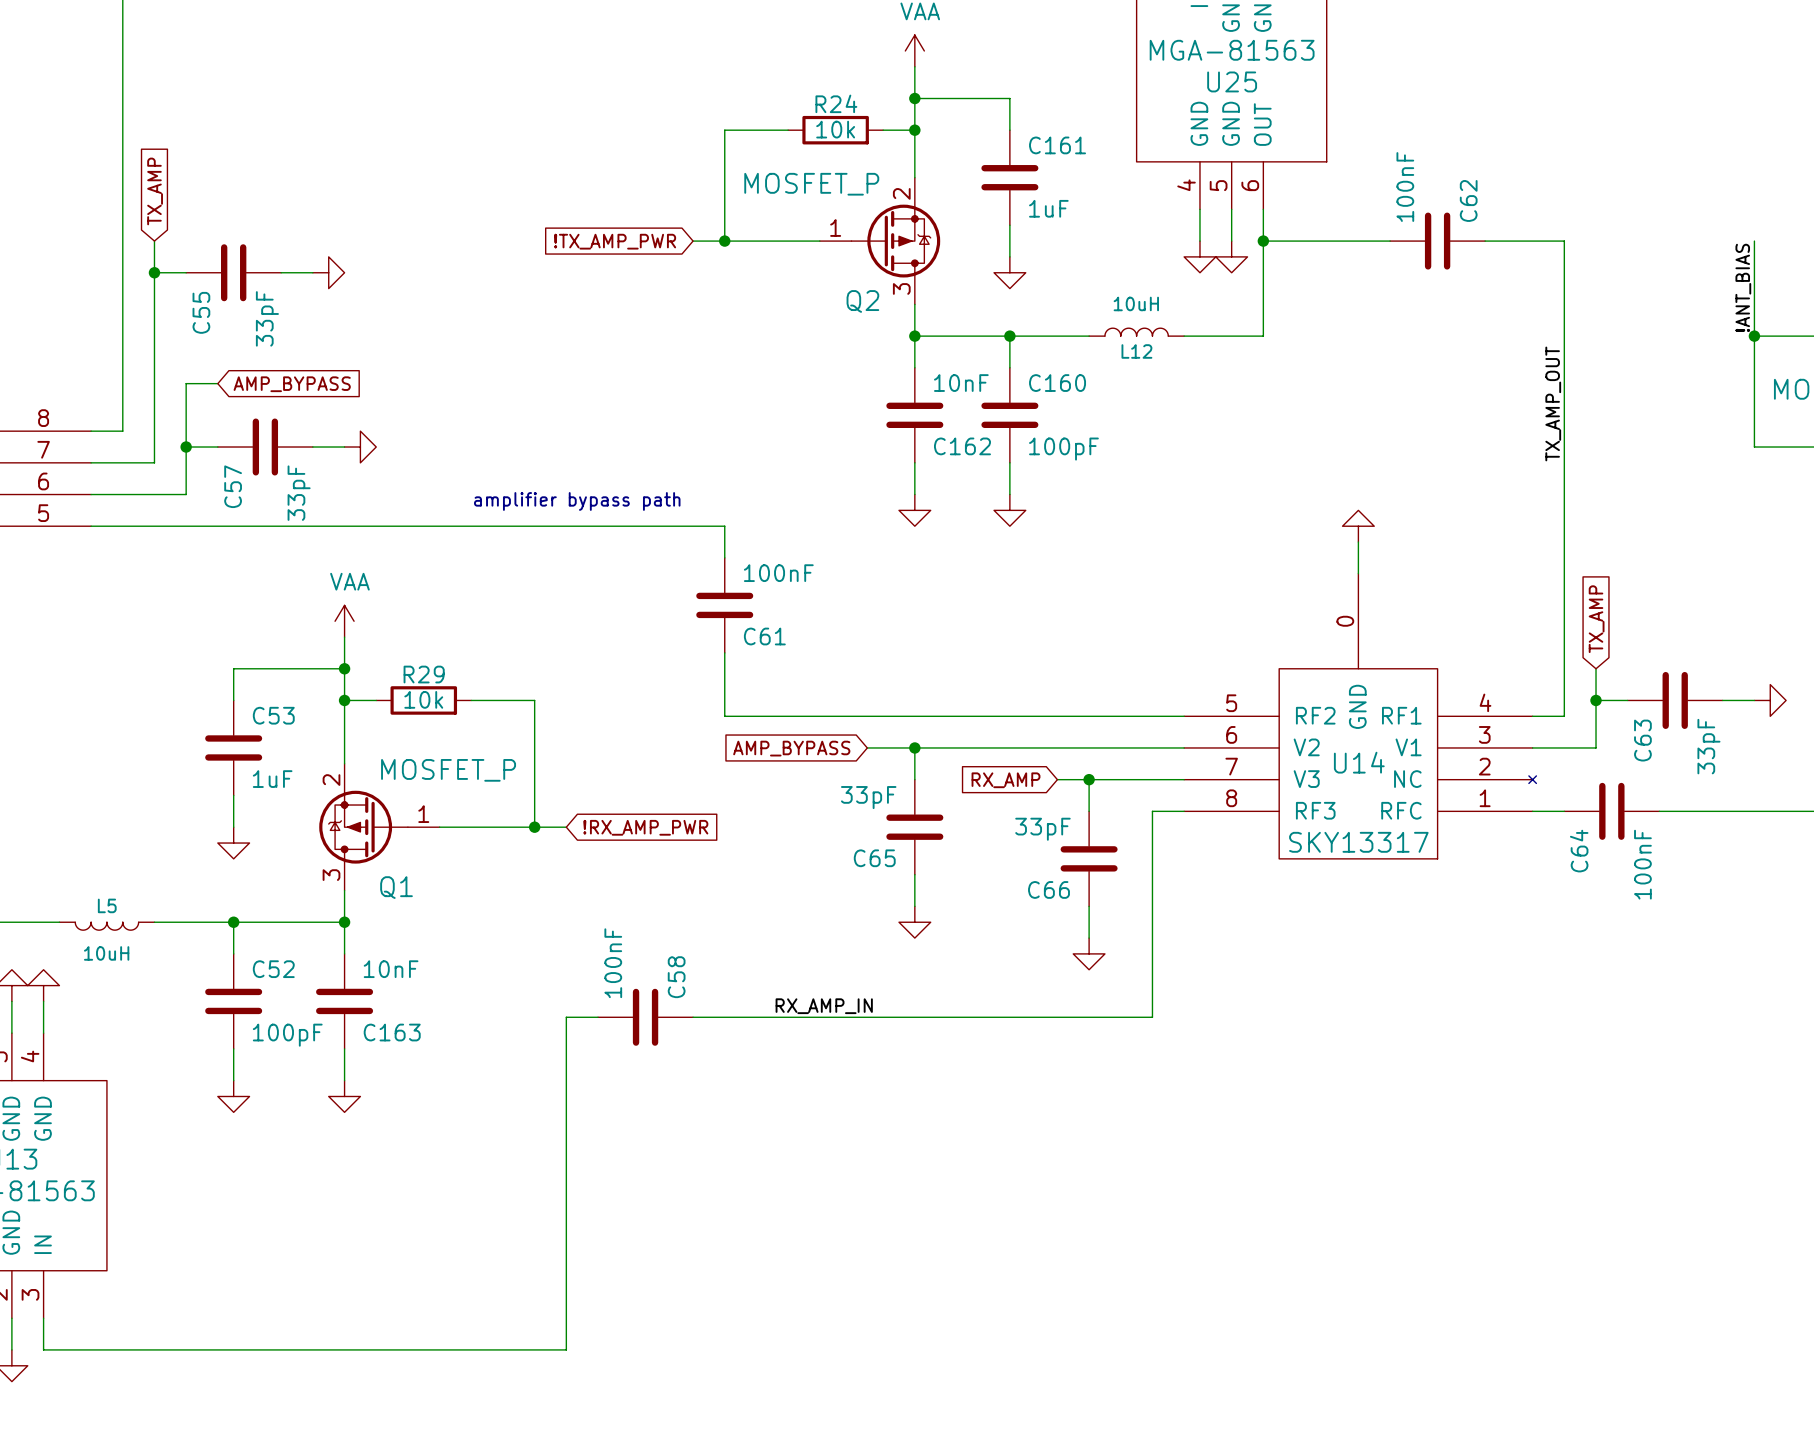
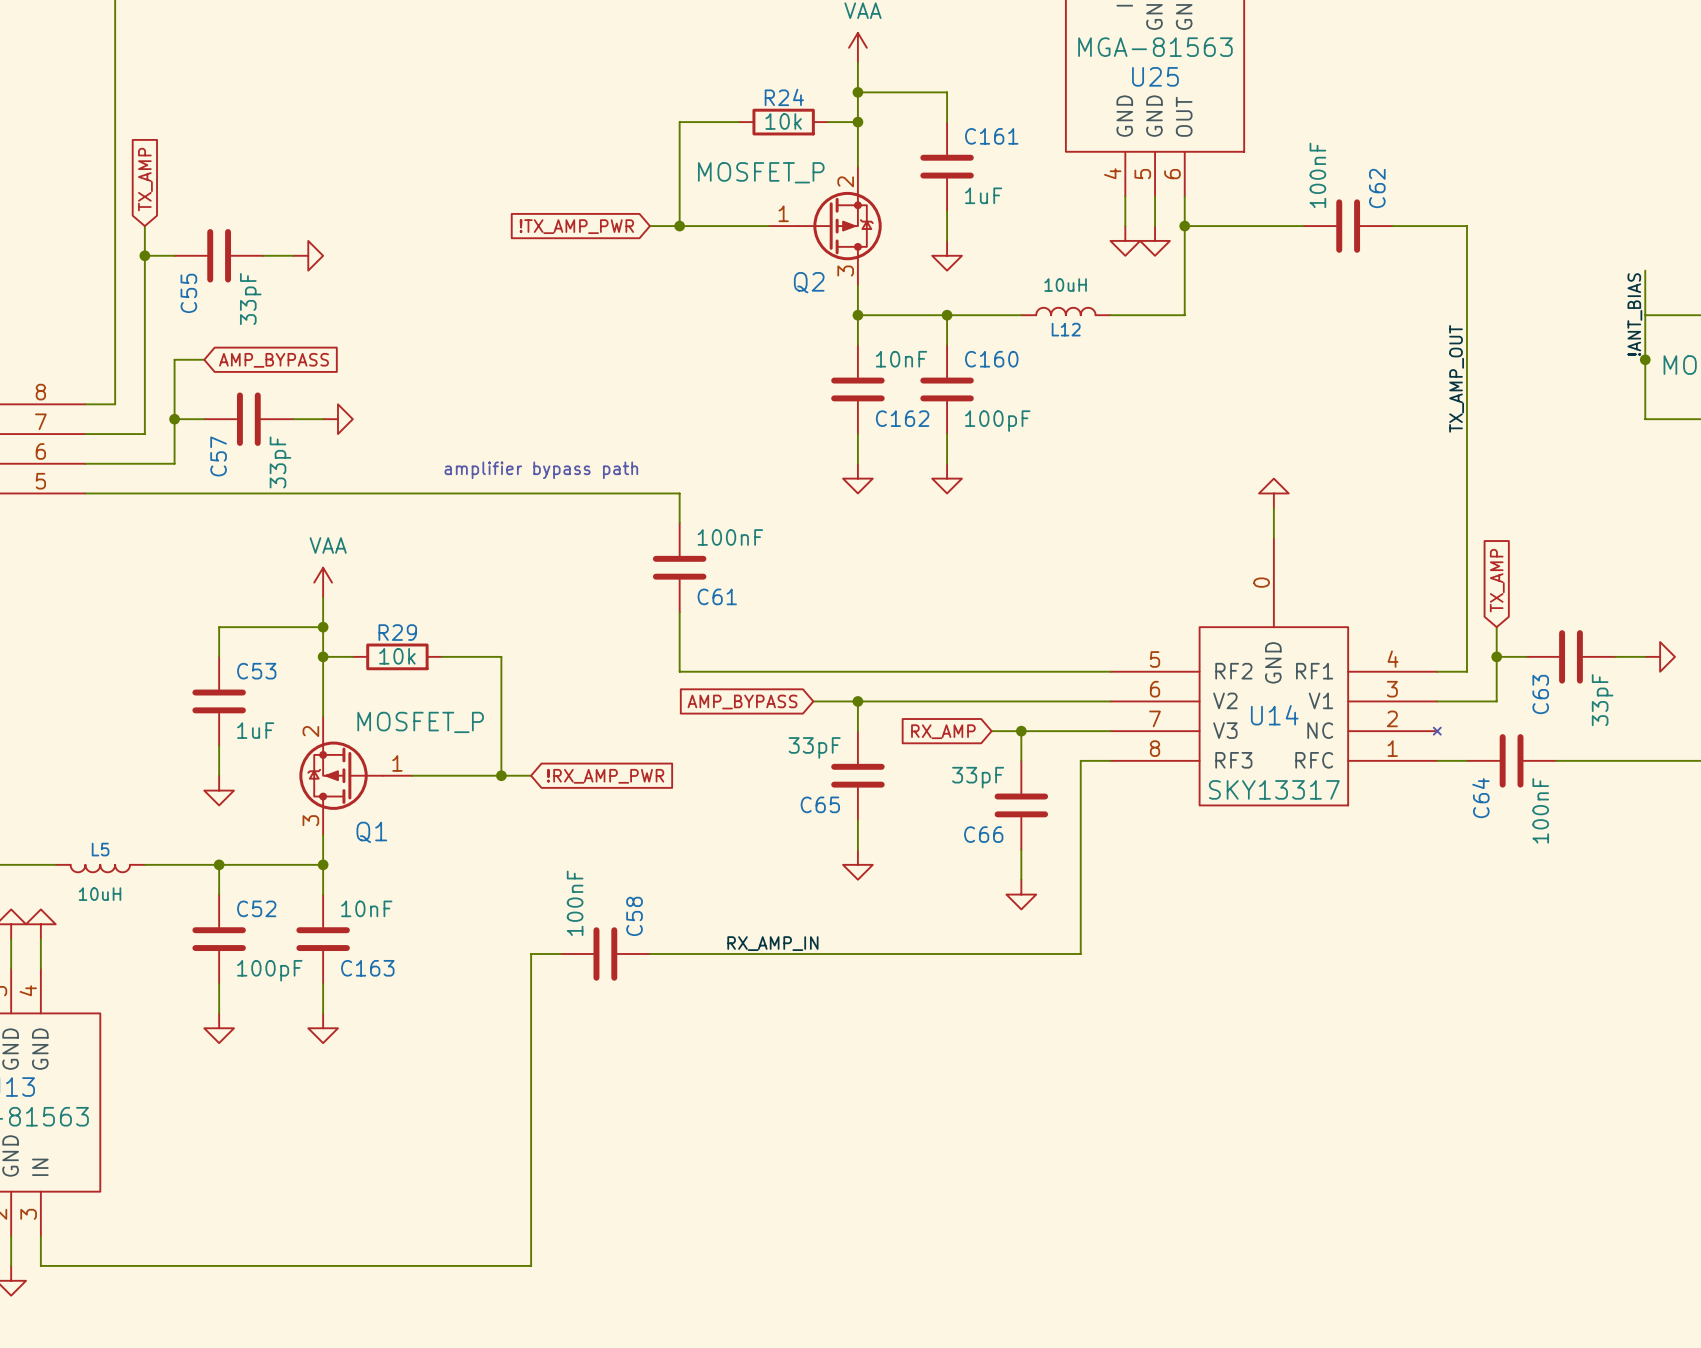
wire: (1754, 241) (1754, 288) -> none
label position: !ANT_BIAS (1743, 287) -> !ANT_BIAS (1634, 314)
junction position: (1754, 336) -> (1645, 359)

